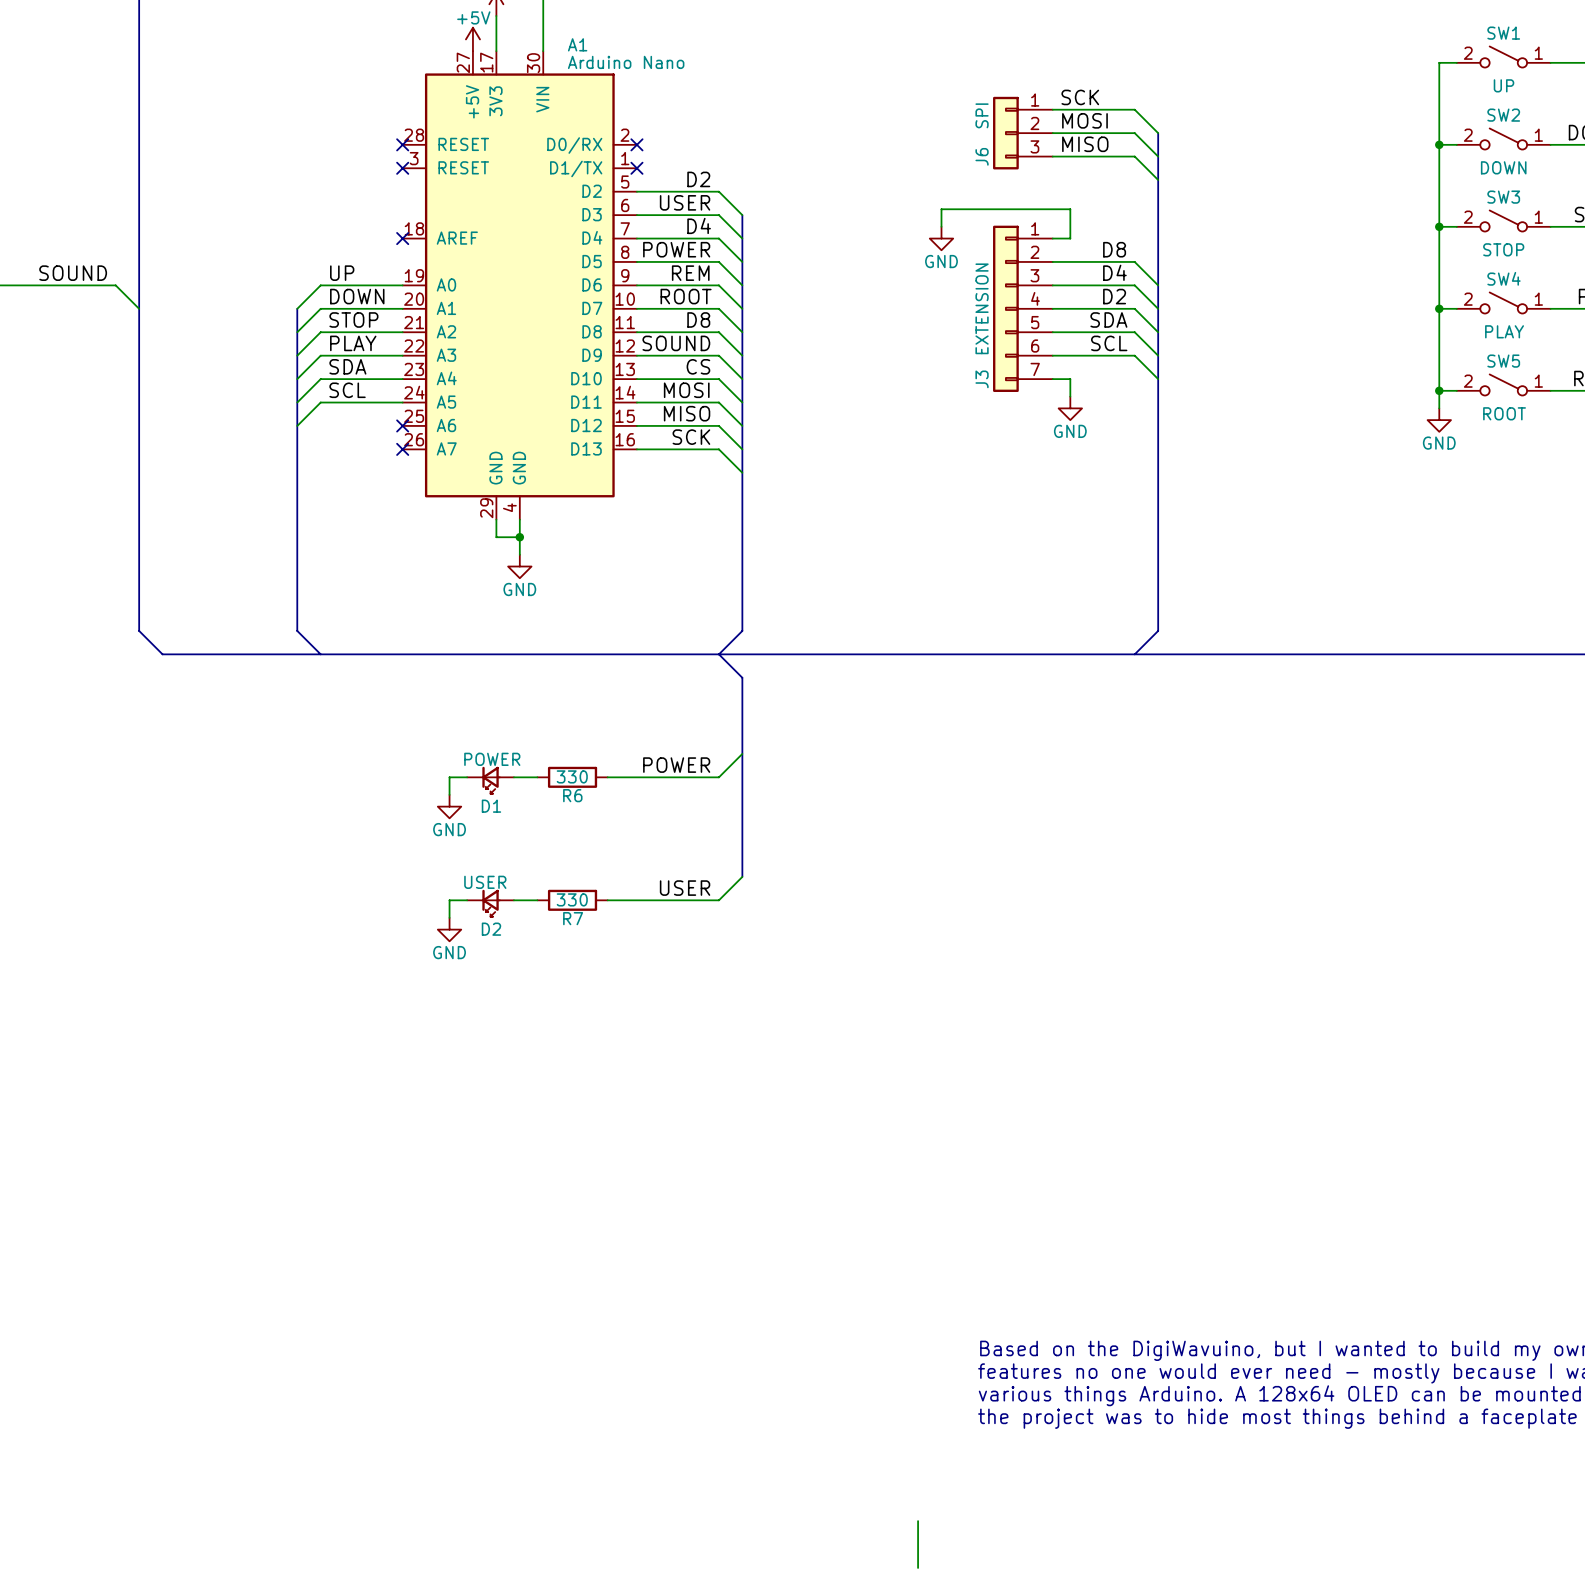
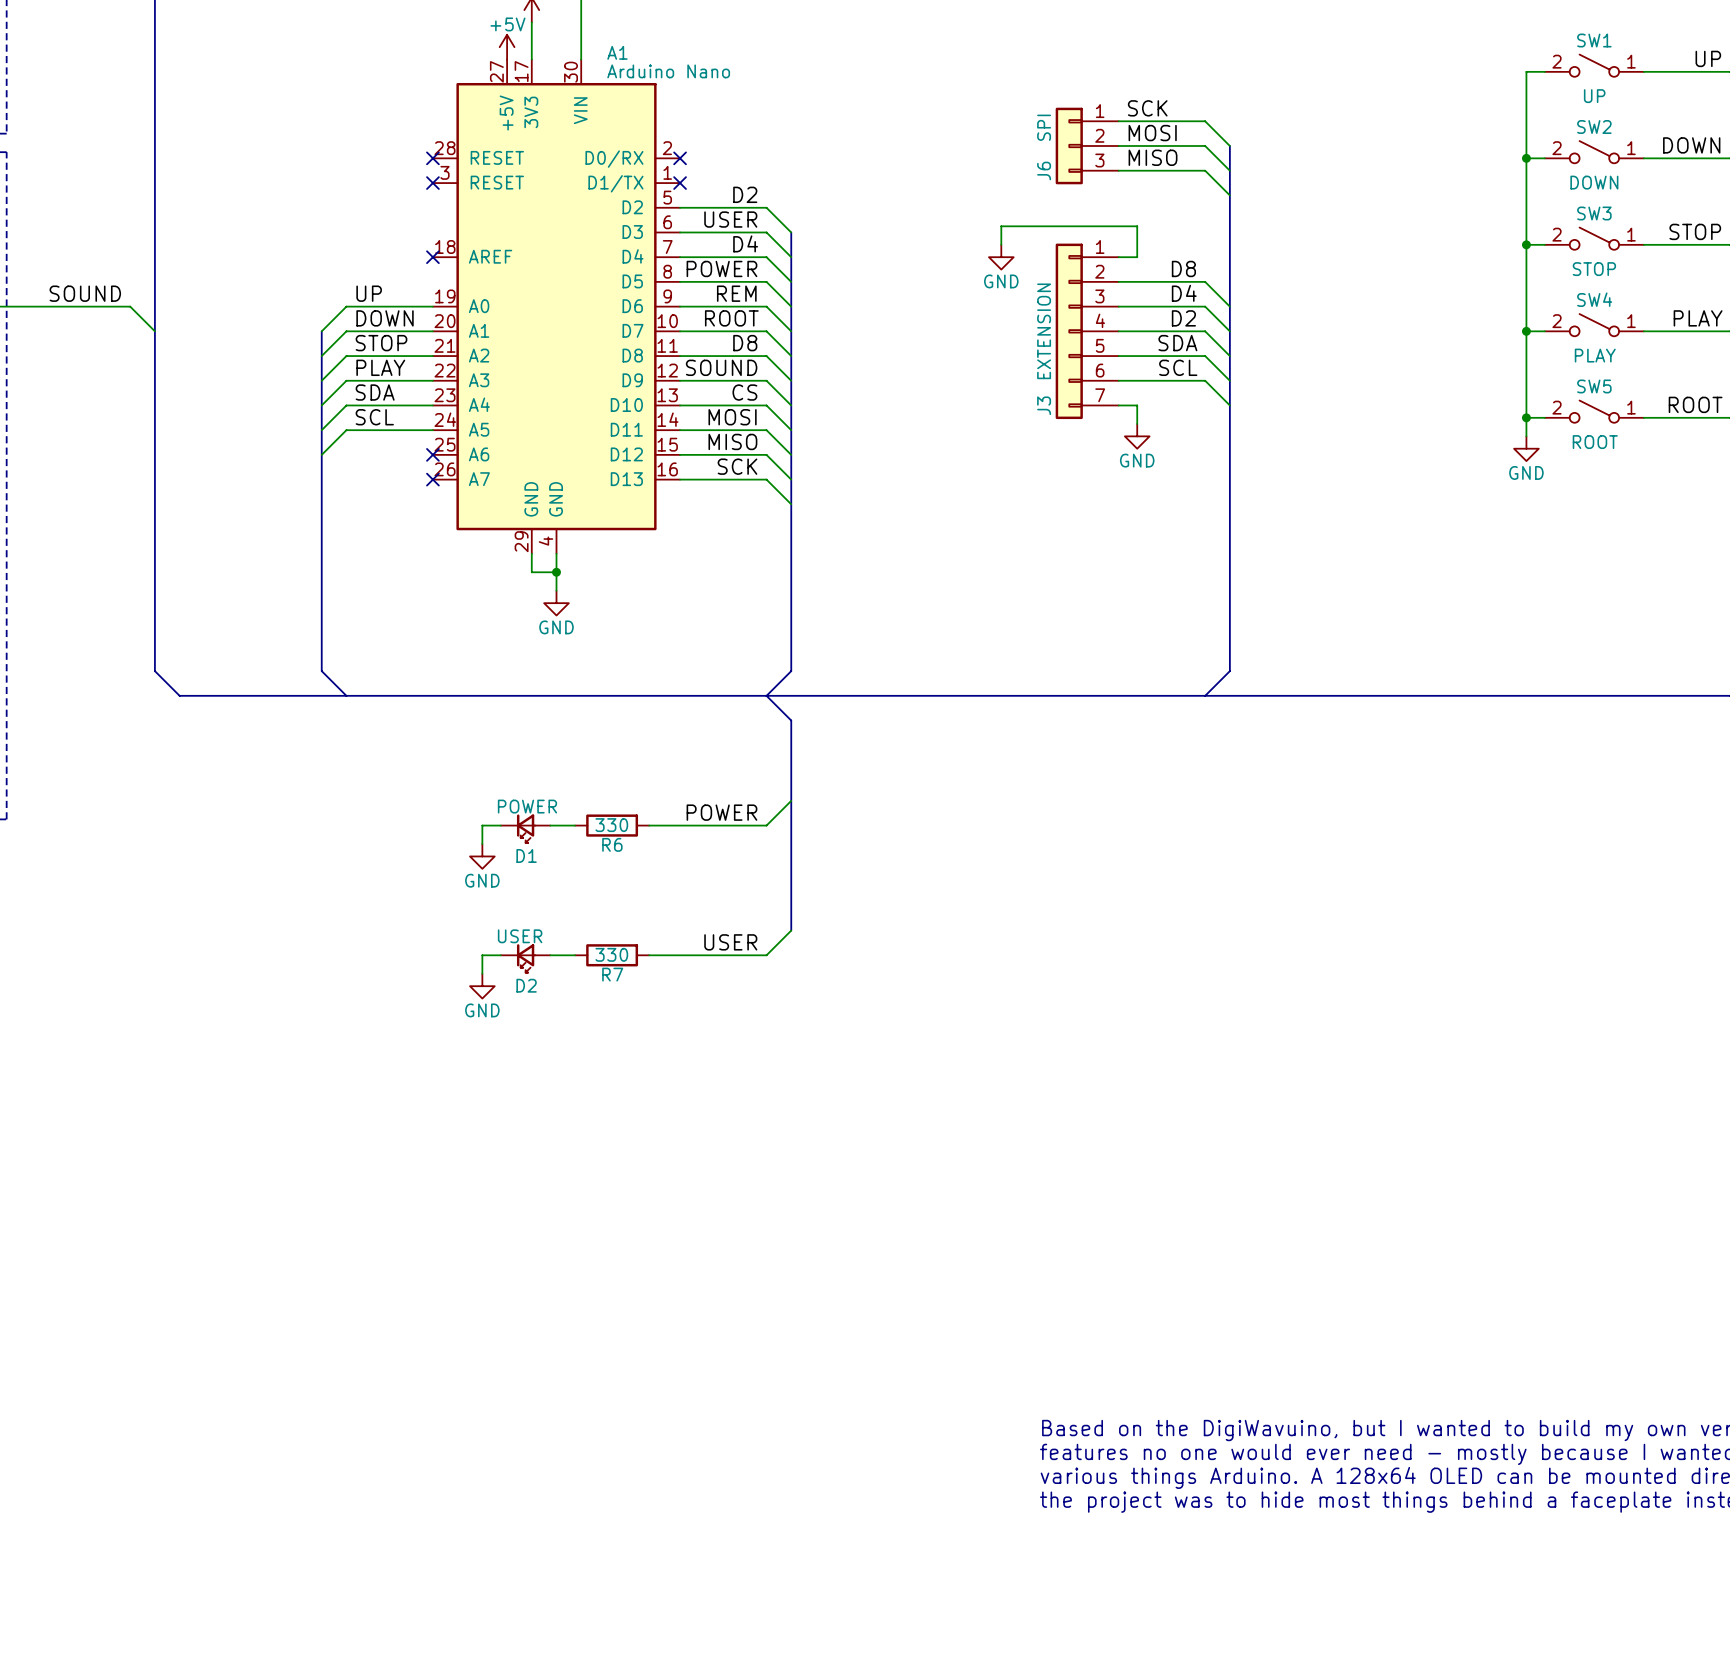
wire: (918, 1521) (918, 1567) -> none

